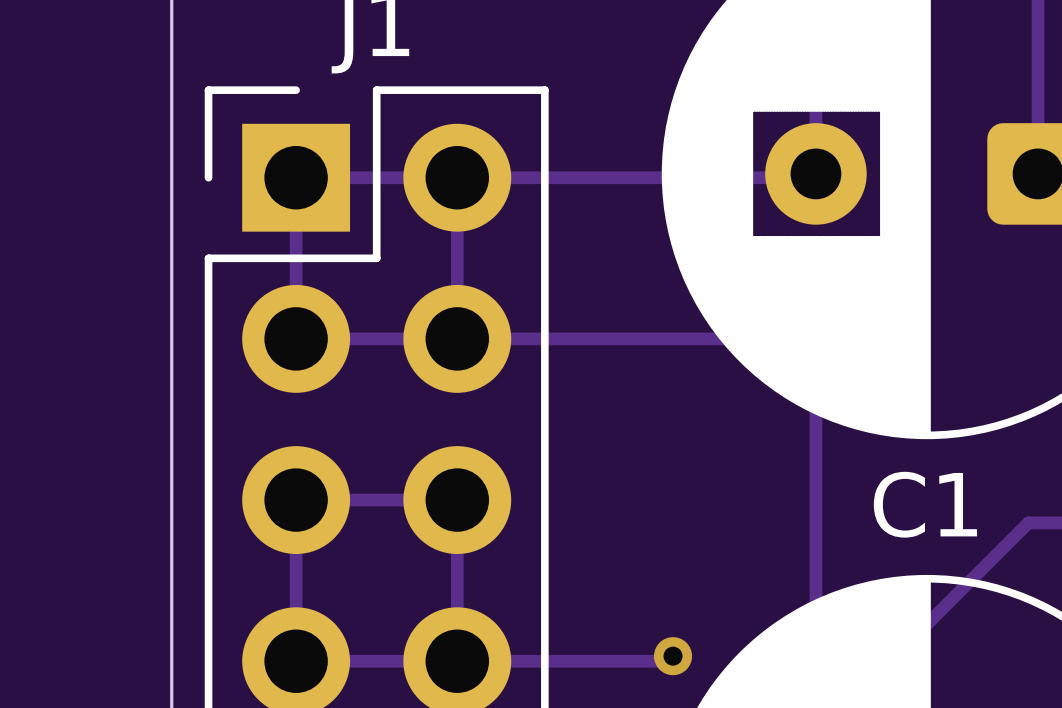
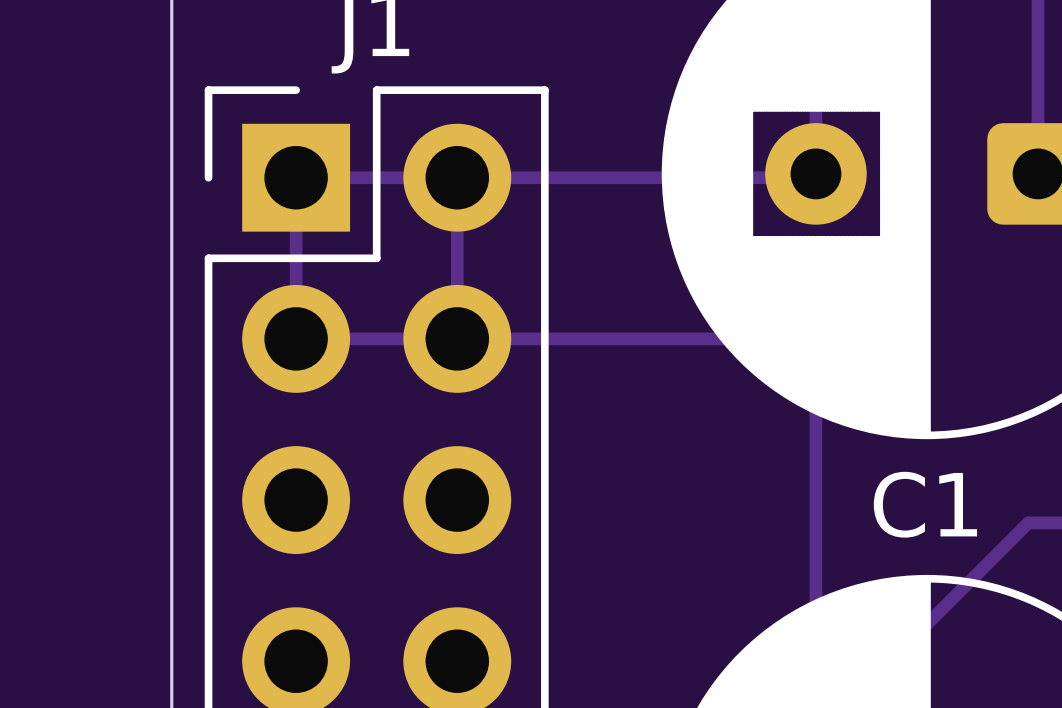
track: (673, 656) (667, 661) (296, 661) (296, 500) (457, 500) (457, 661) -> none
via: (673, 656) -> none

